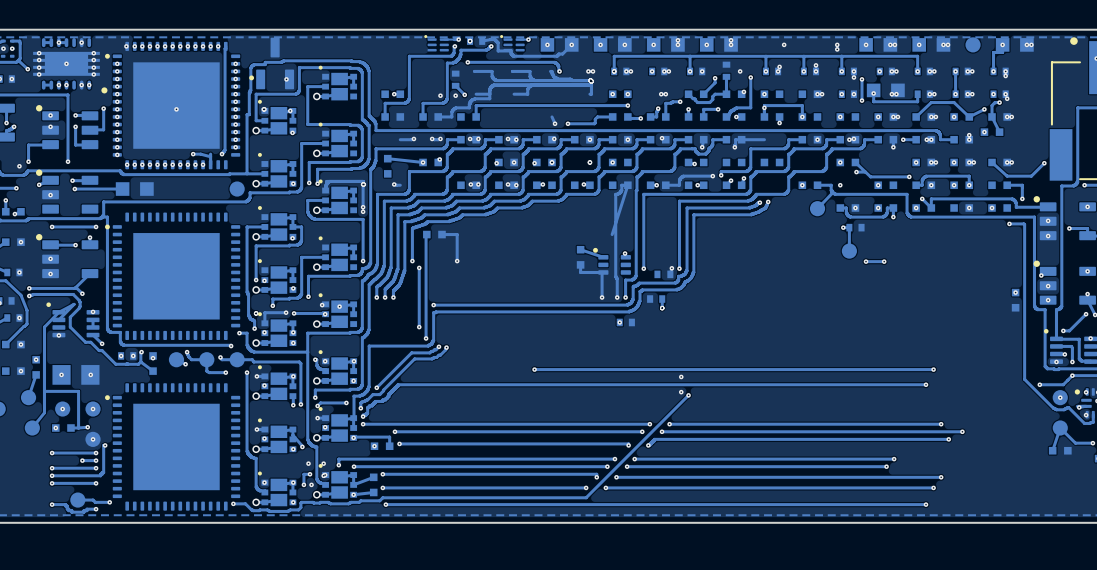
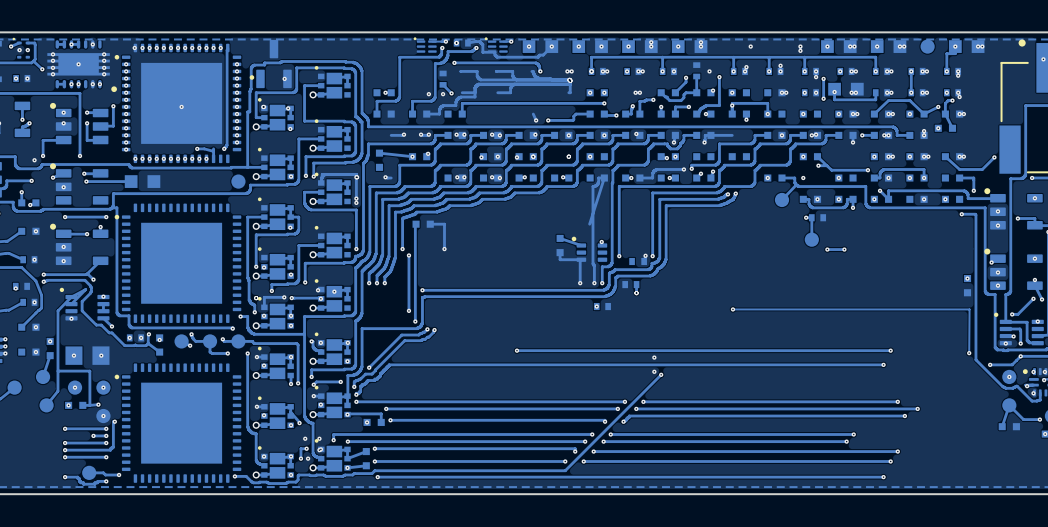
via: none -> (675, 156)
track: none -> (732, 309) (969, 309) (969, 353)
via: none -> (732, 309)
via: none -> (969, 353)

